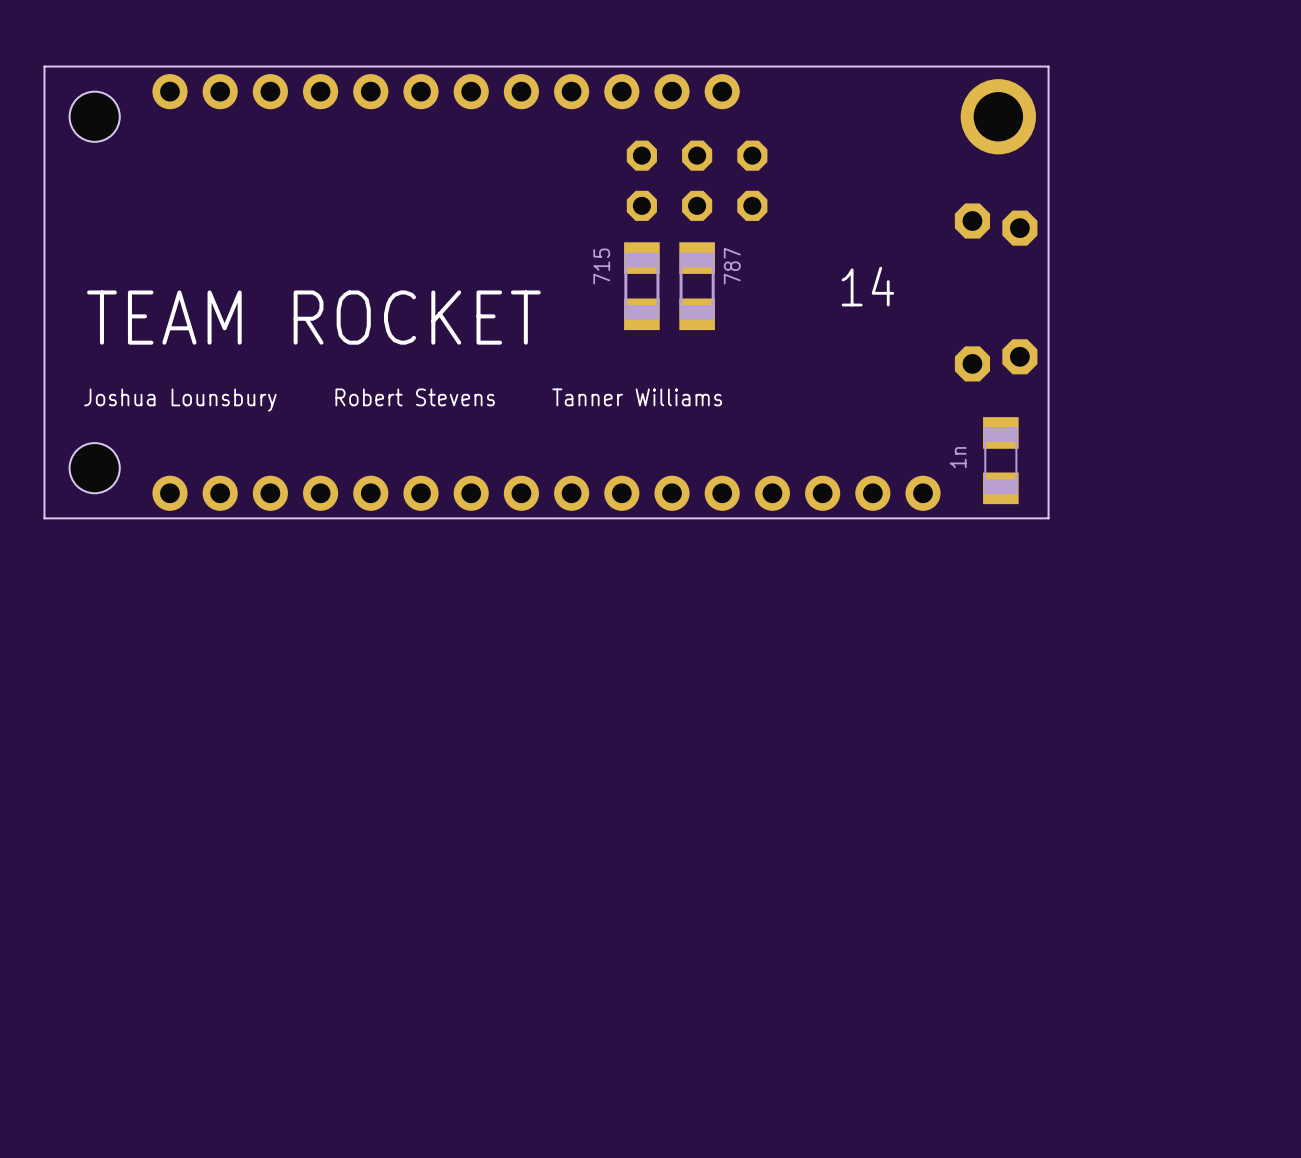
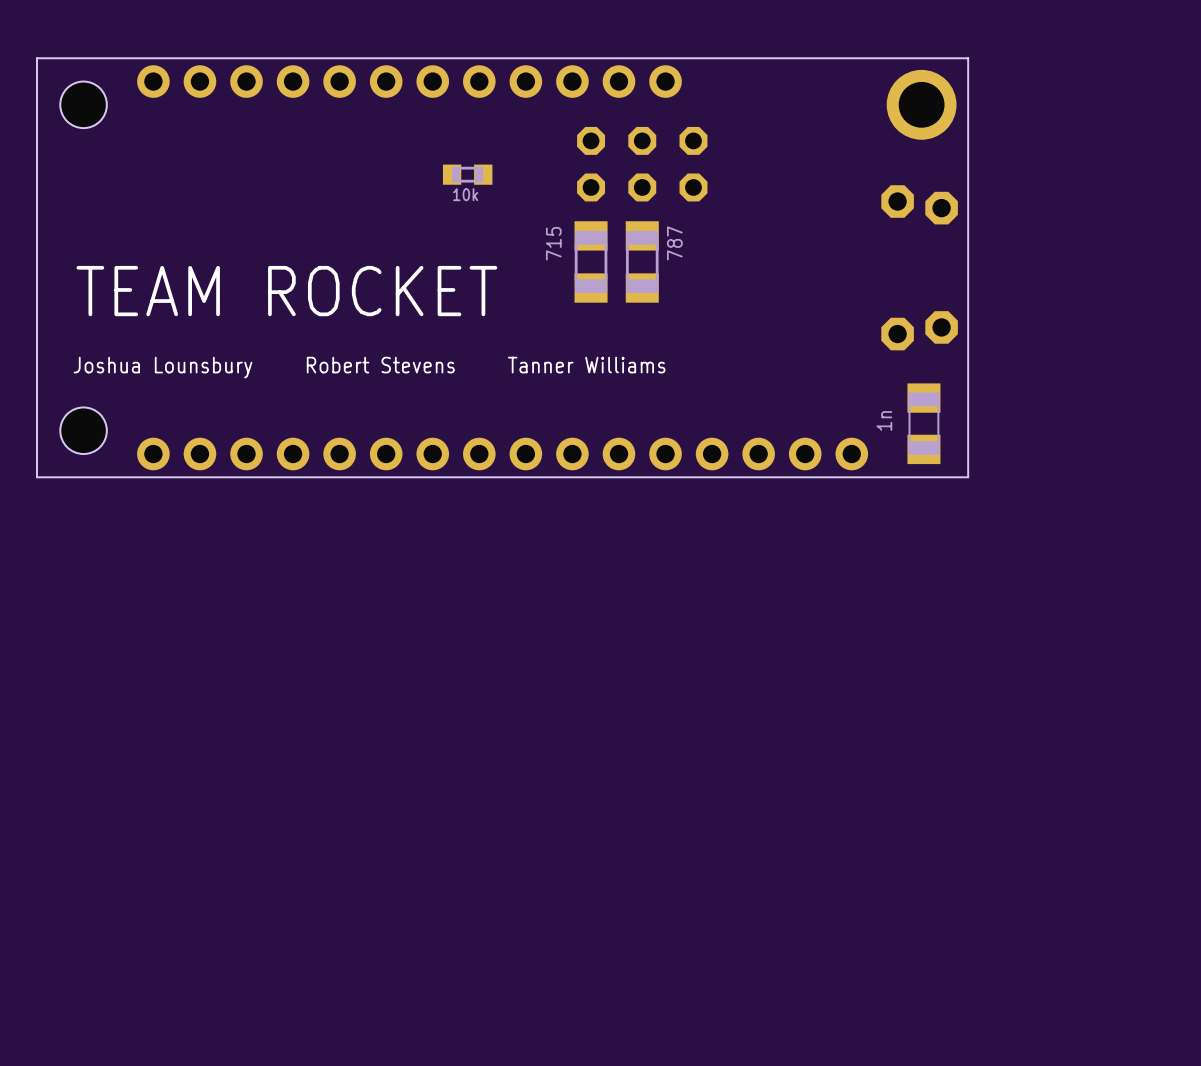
part: none -> 10k (467, 174)
text: 14 (867, 286) -> none

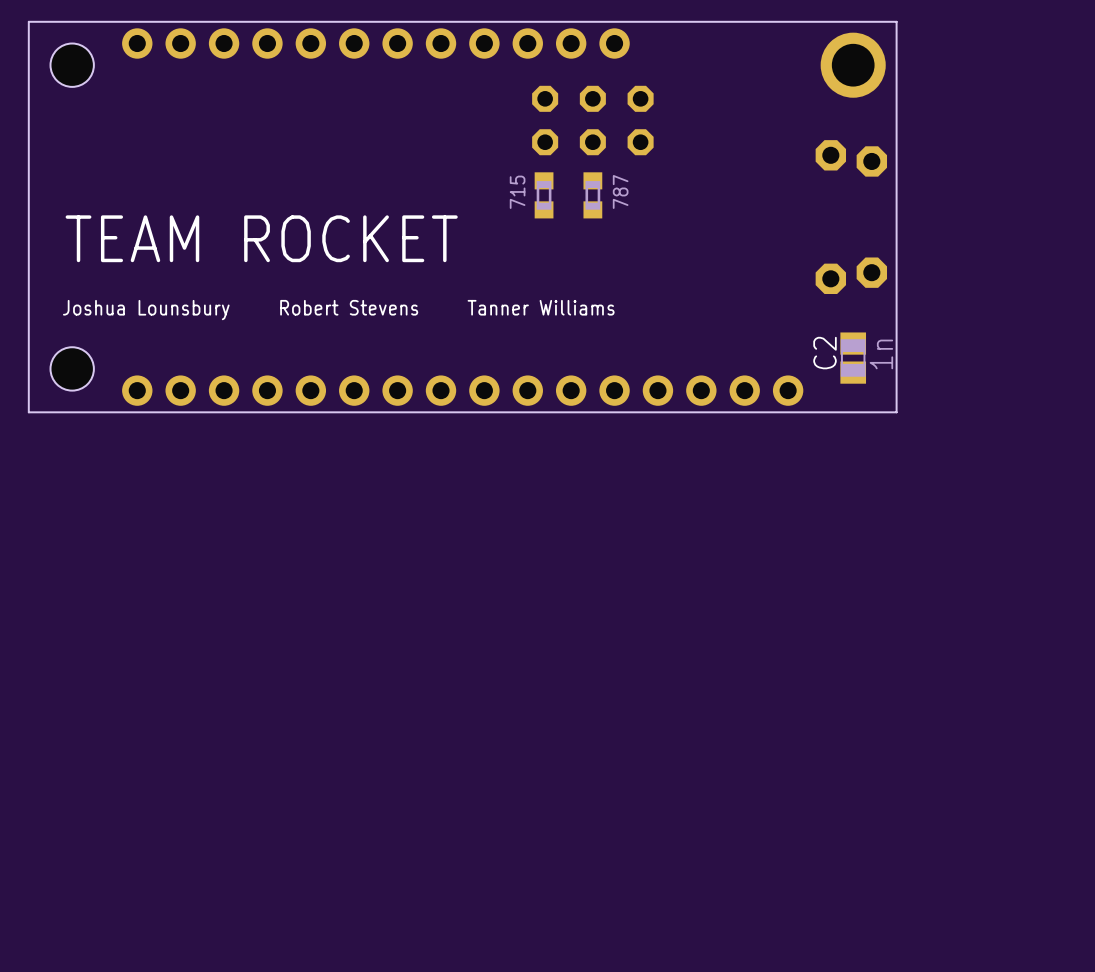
part: 10k (467, 174) -> none
part footprint: [574, 221, 608, 303] -> [534, 172, 554, 219]
part footprint: [625, 221, 659, 303] -> [583, 172, 603, 219]
C2: none -> 1n (853, 358)
part: 1n (923, 423) -> none

